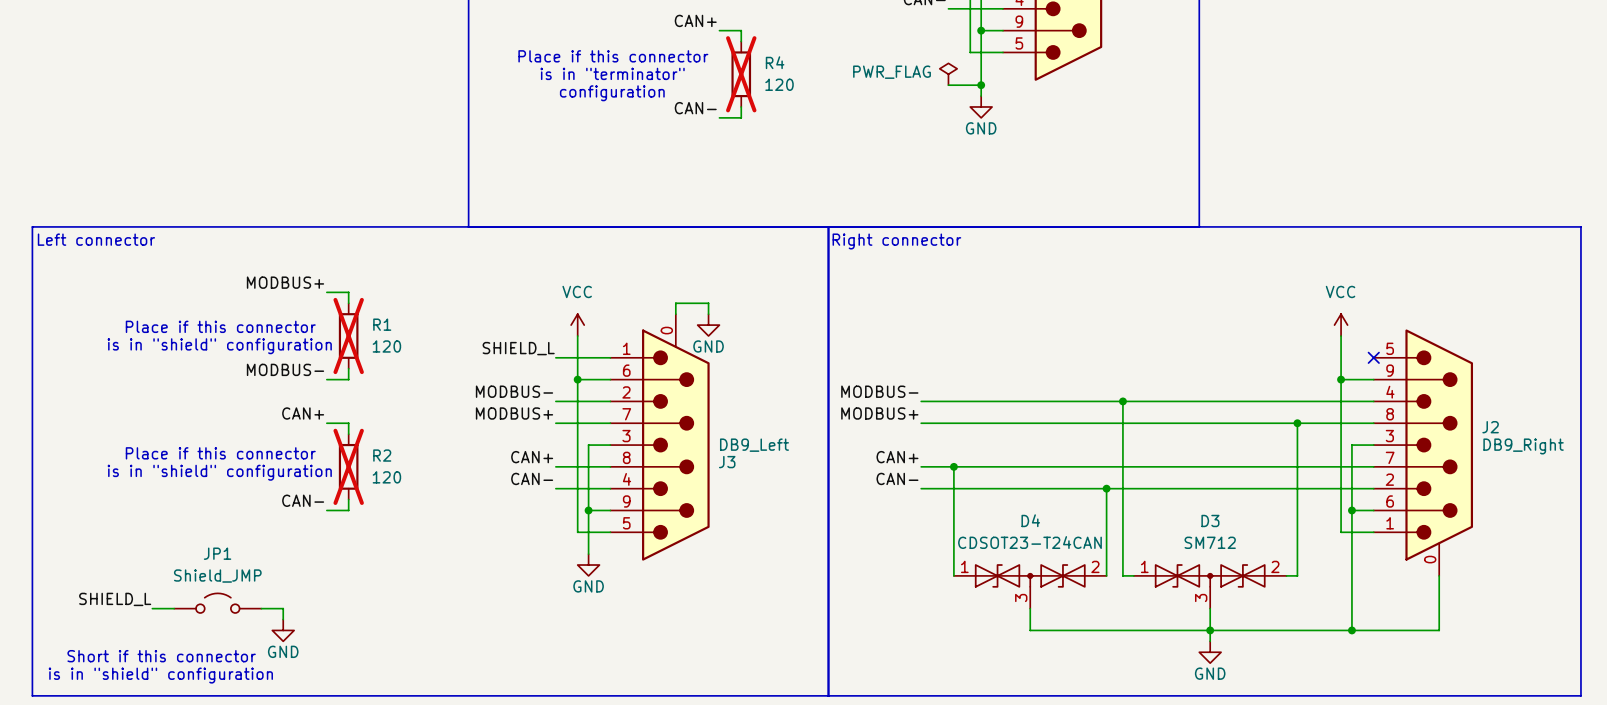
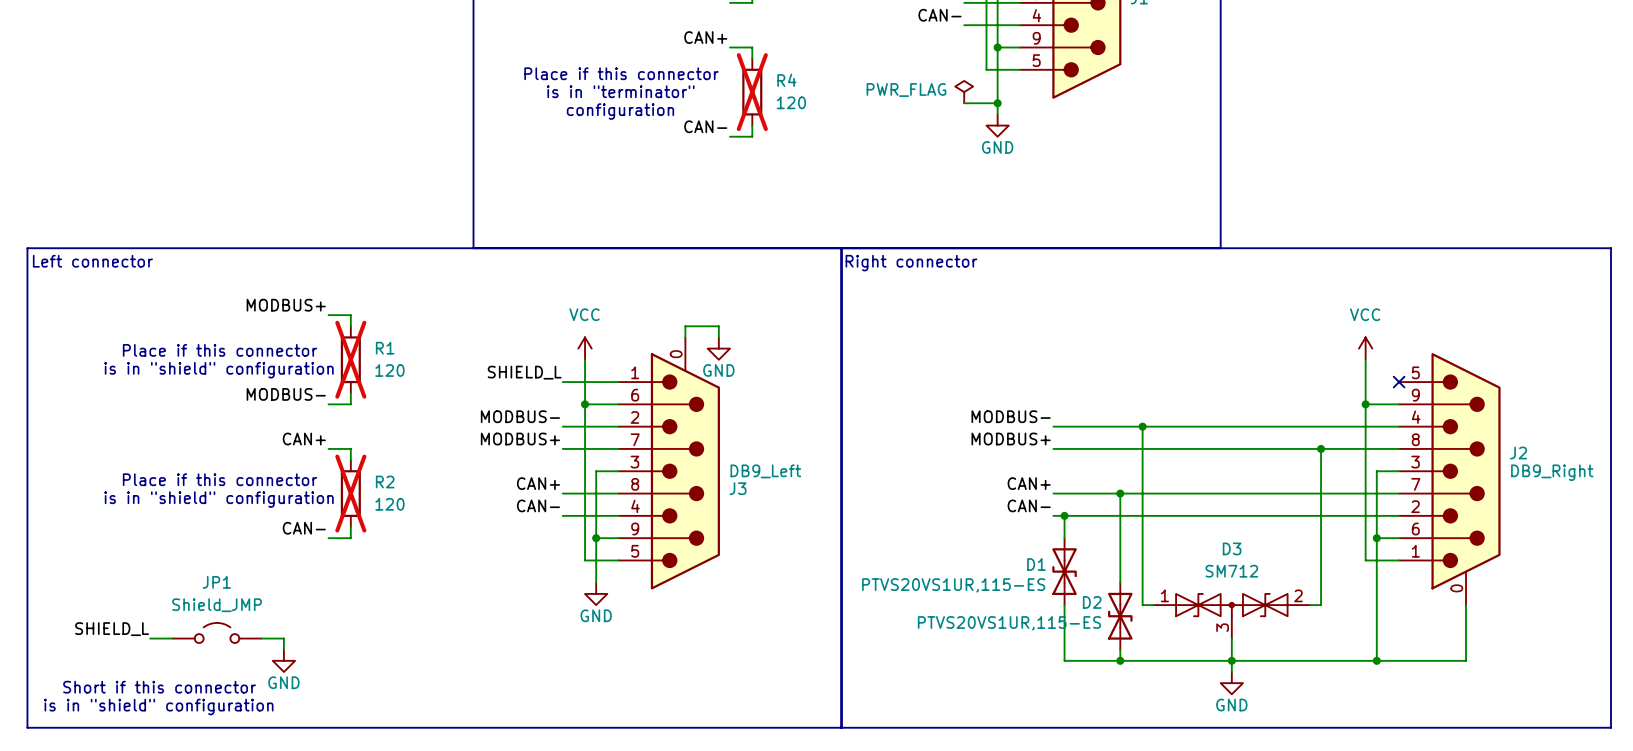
label position: MODBUS- (879, 391) -> MODBUS- (1011, 416)
wire: (921, 401) (1035, 401) -> none
label position: MODBUS+ (879, 413) -> MODBUS+ (1011, 439)
wire: (921, 423) (1035, 423) -> none
label position: CAN+ (897, 457) -> CAN+ (1029, 483)
wire: (921, 466) (1035, 466) -> none
wire: (953, 466) (953, 575) -> none
junction: (953, 466) -> none
label position: CAN- (897, 478) -> CAN- (1029, 505)
wire: (921, 488) (1035, 488) -> none
wire: none -> (1064, 515) (1064, 538)
junction: none -> (1064, 515)
wire: (1106, 488) (1106, 575) -> (1120, 493) (1120, 582)
junction position: (1106, 488) -> (1120, 493)
D1: none -> PTVS20VS1UR,115-ES (1064, 571)
D4: CDSOT23-T24CAN (1030, 586) -> none
D2: none -> PTVS20VS1UR,115-ES (1120, 616)
wire: (1030, 608) (1030, 630) (1046, 630) -> (1064, 605) (1064, 660)
wire: none -> (1120, 649) (1120, 660)
junction: none -> (1120, 660)

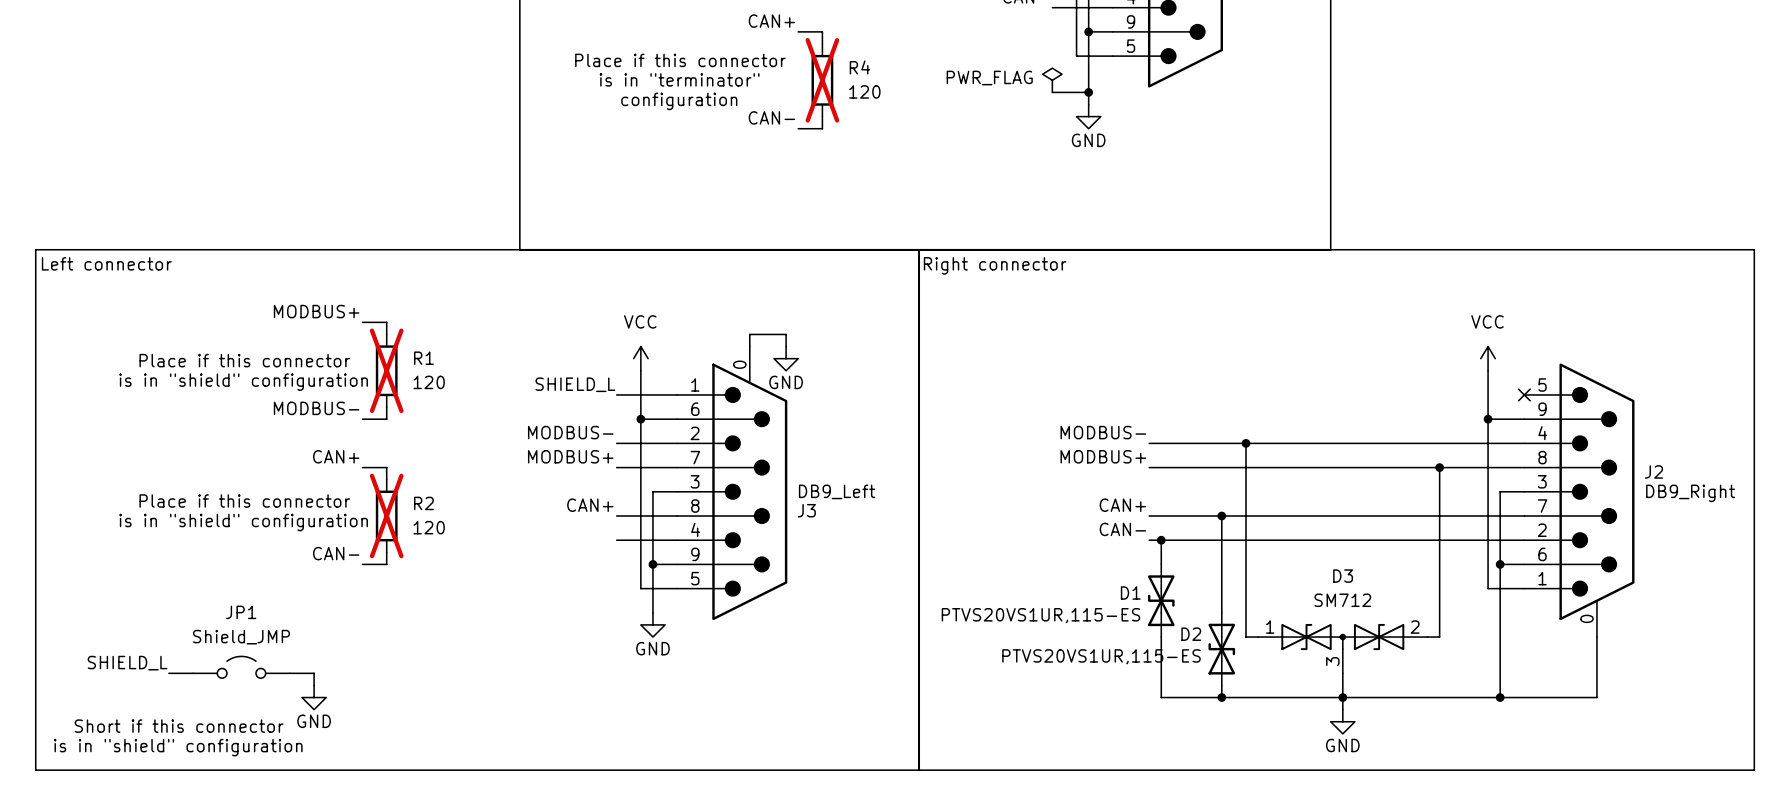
label: CAN- (538, 505) -> none

